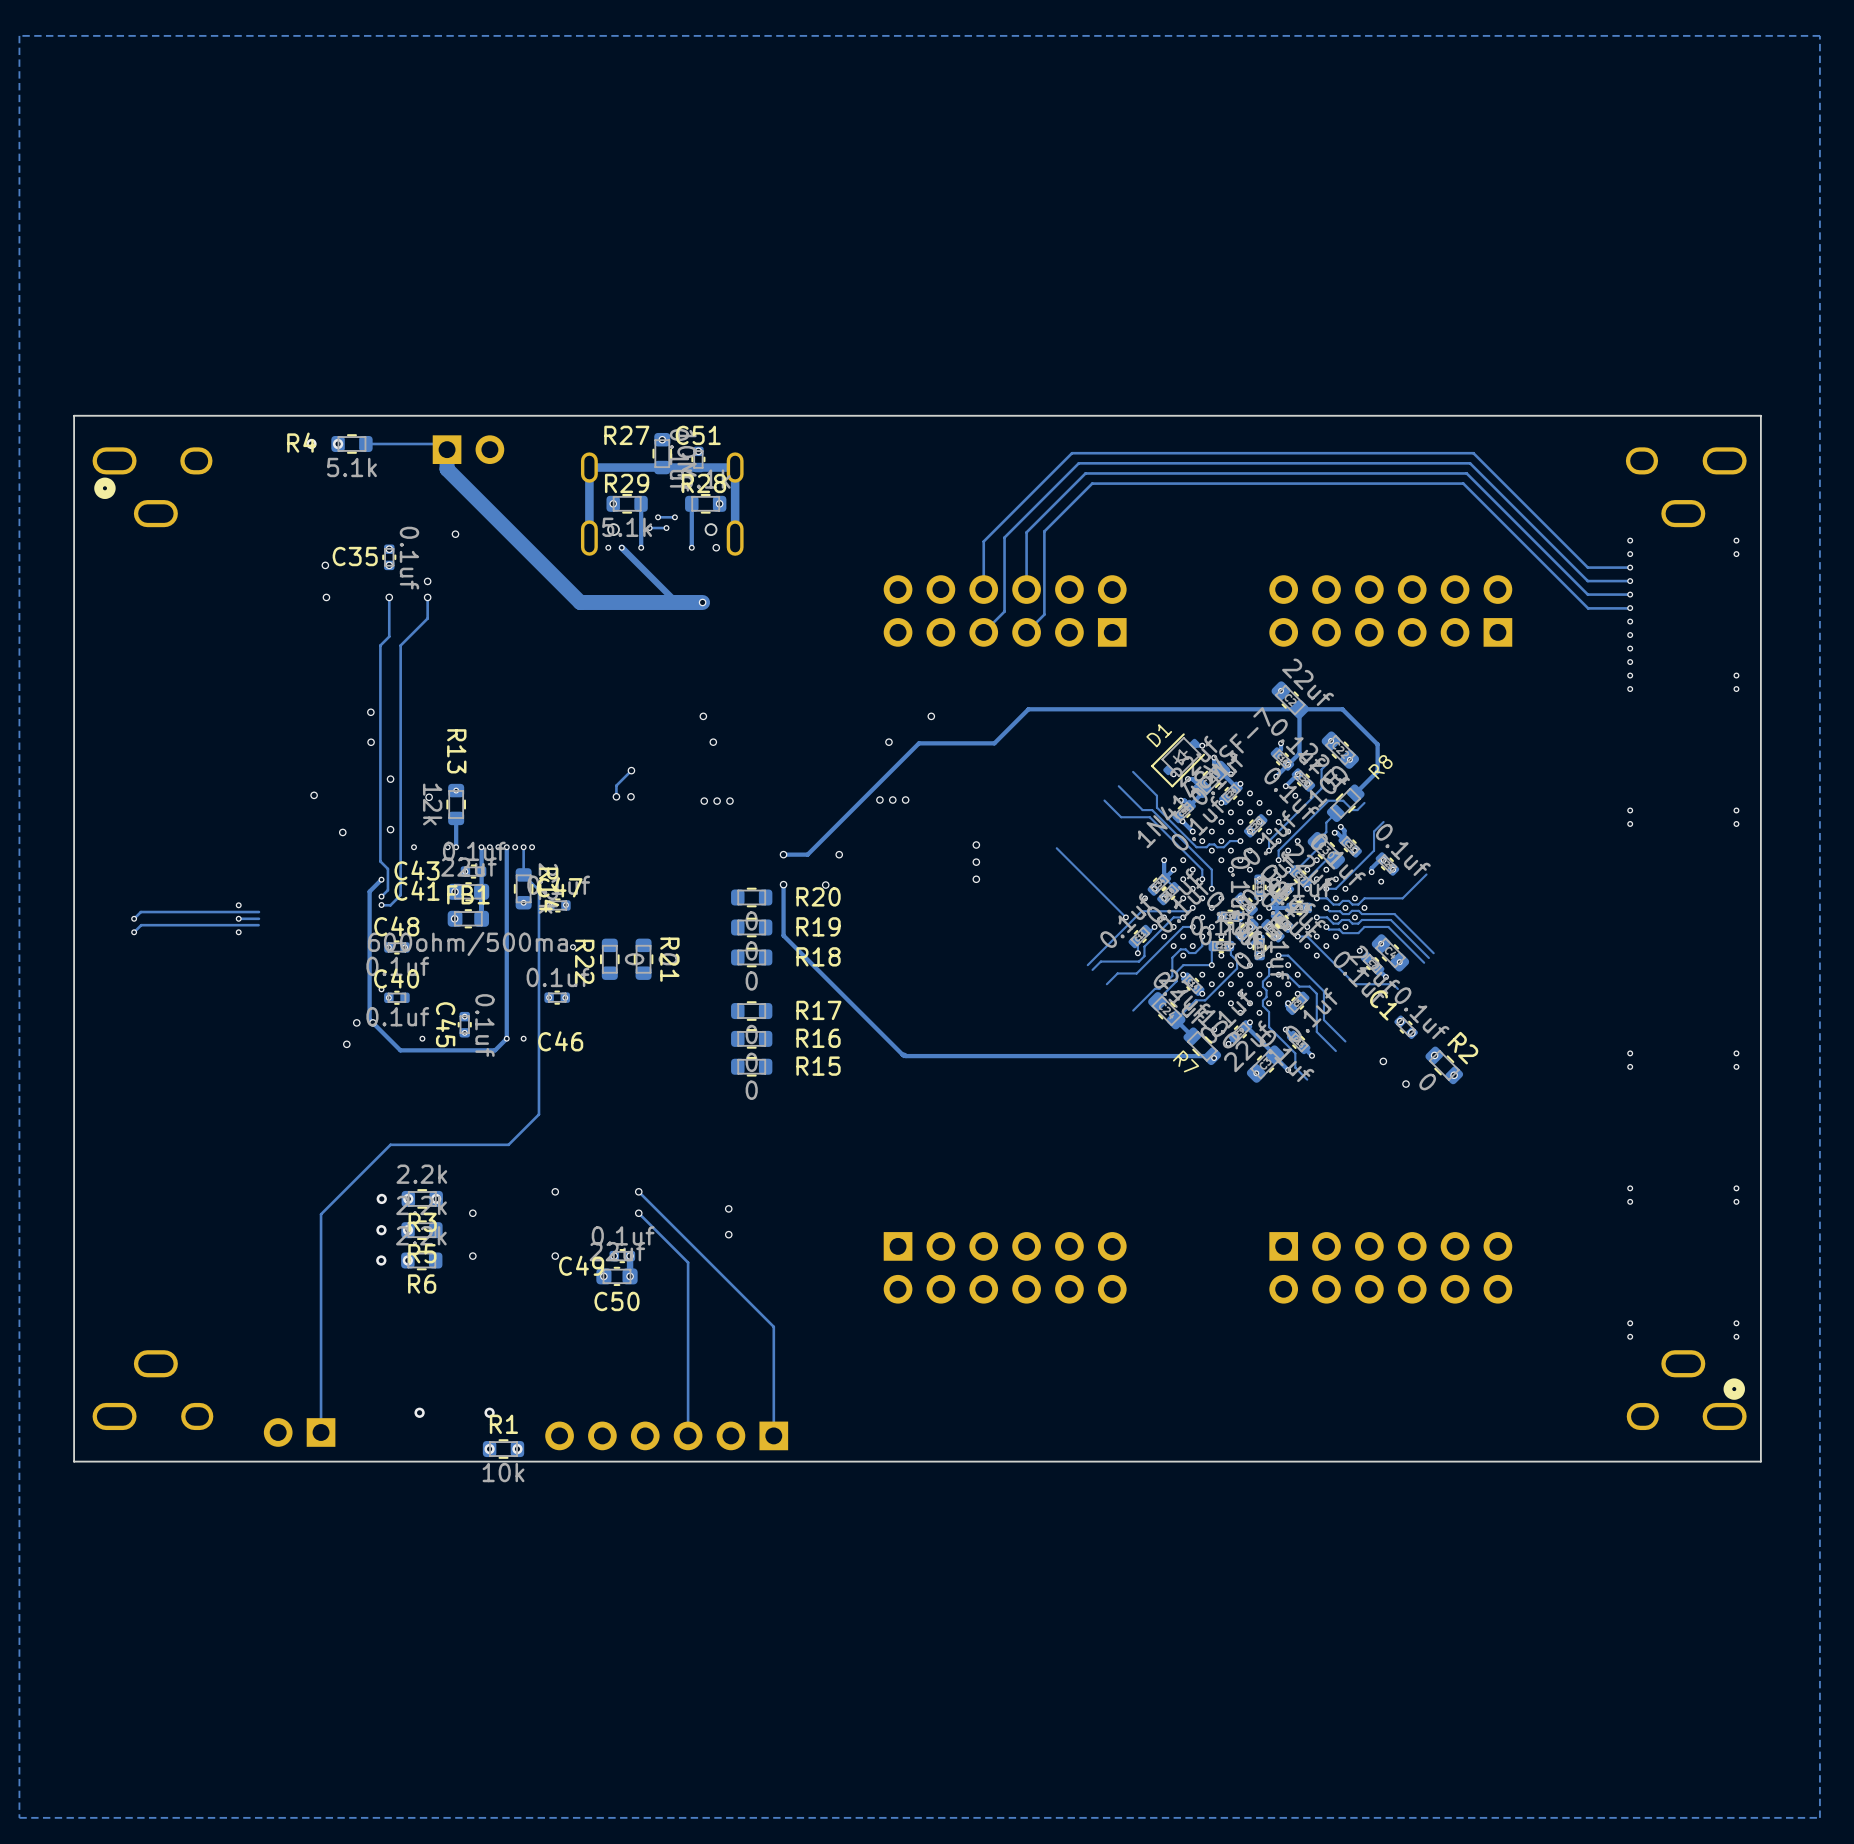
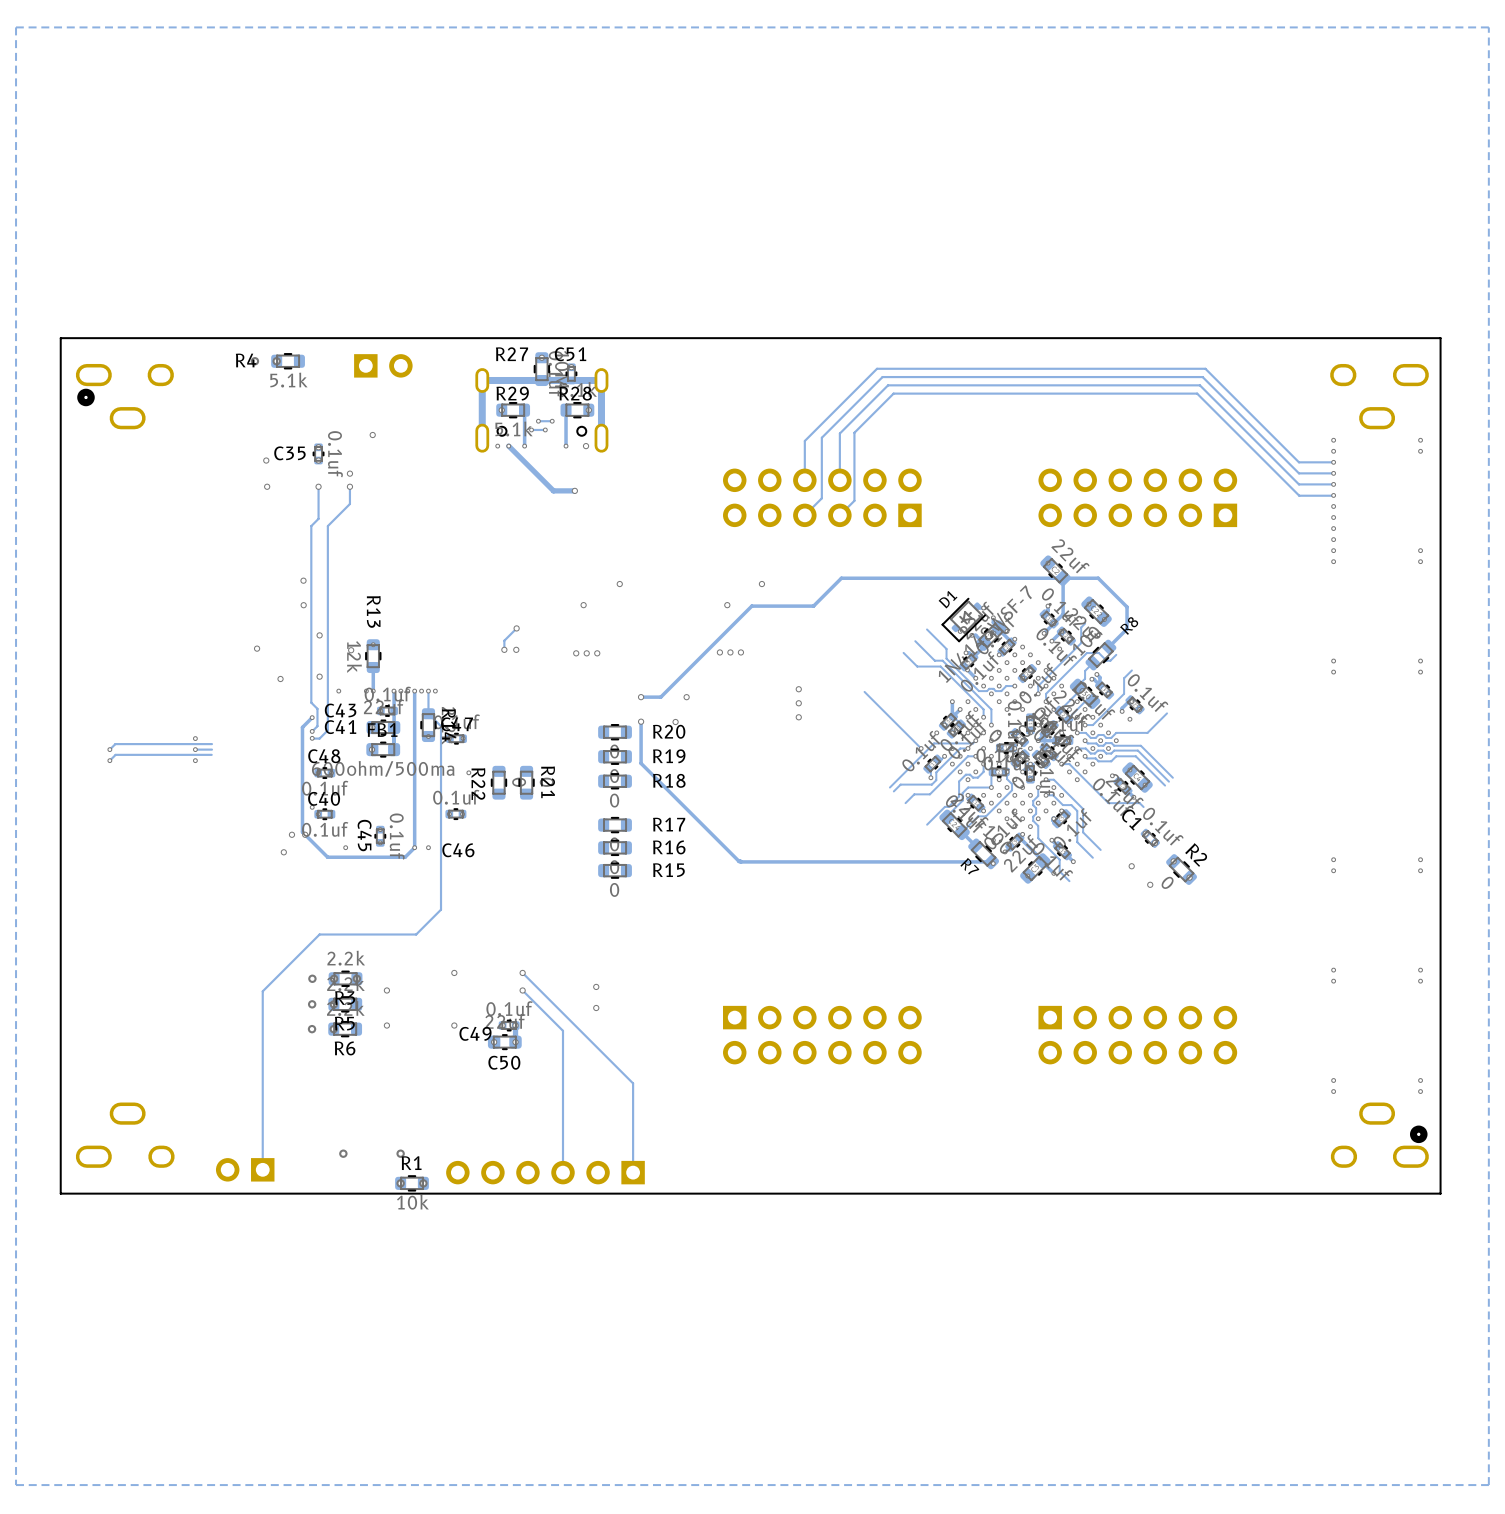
track: (365, 444) (441, 444) (447, 449) (447, 469) (580, 602) (702, 602) -> none
via position: (703, 716) -> (619, 584)

